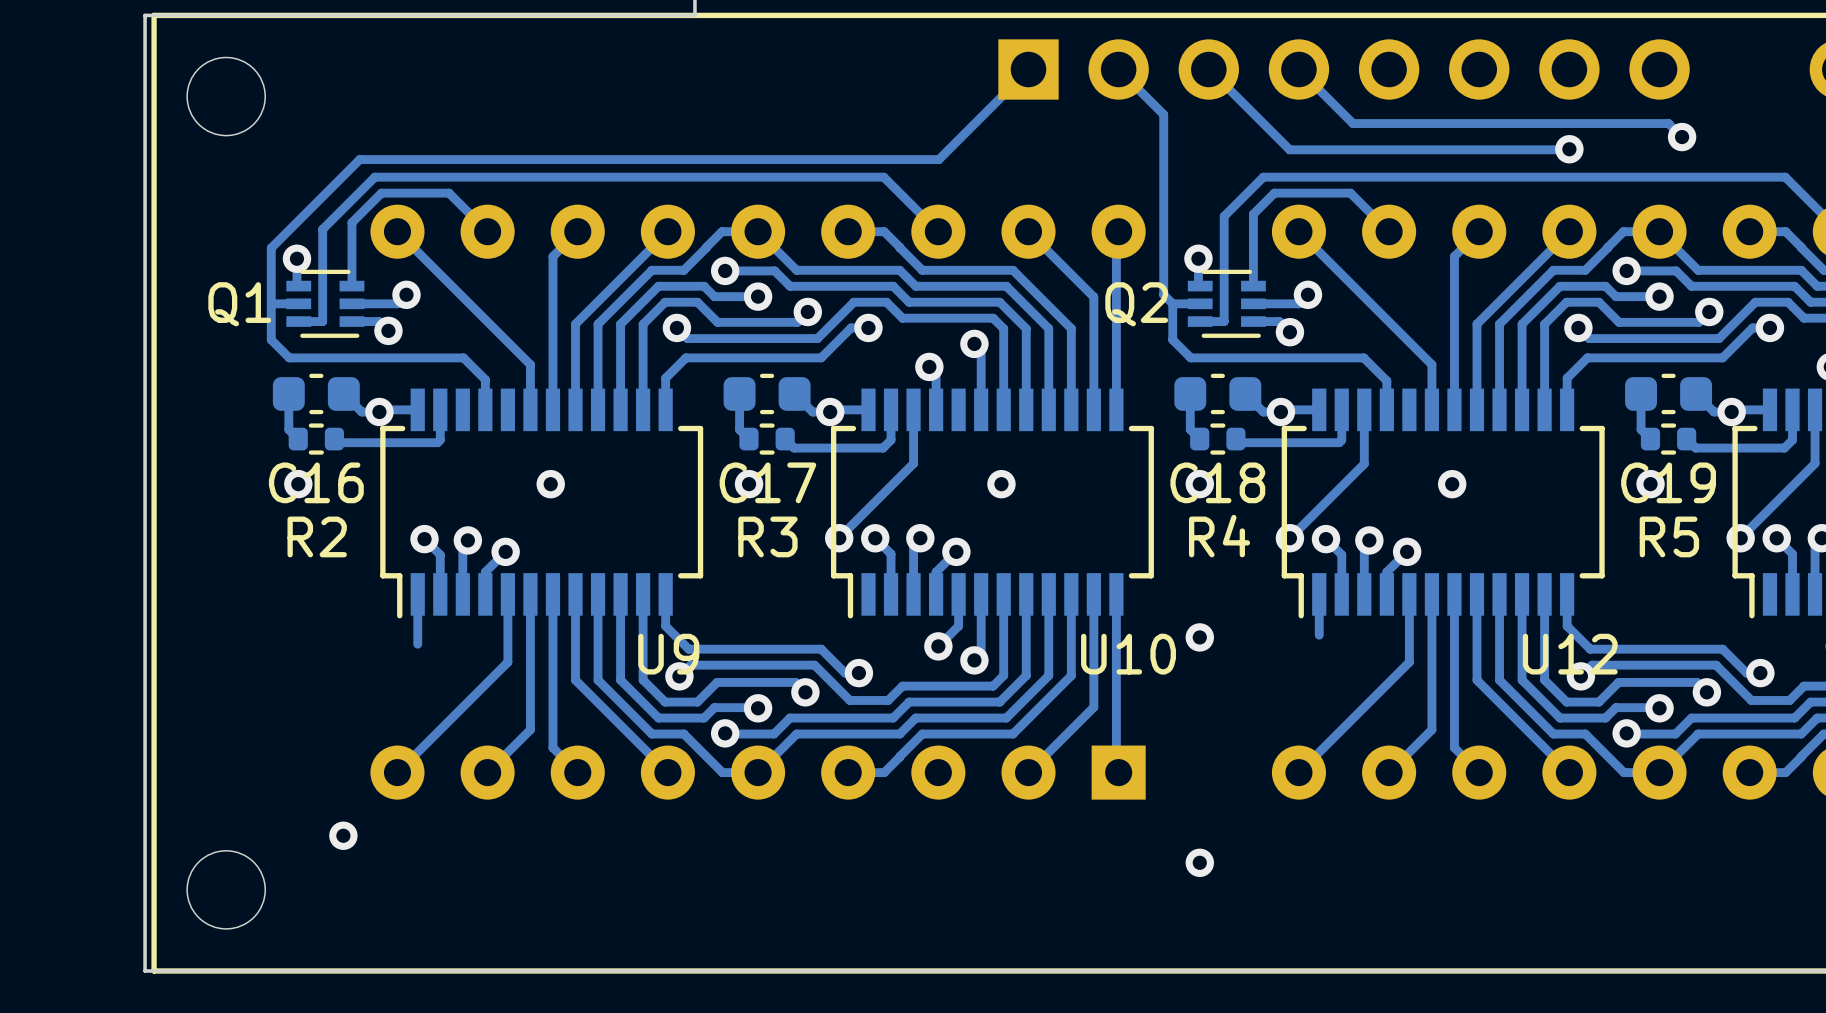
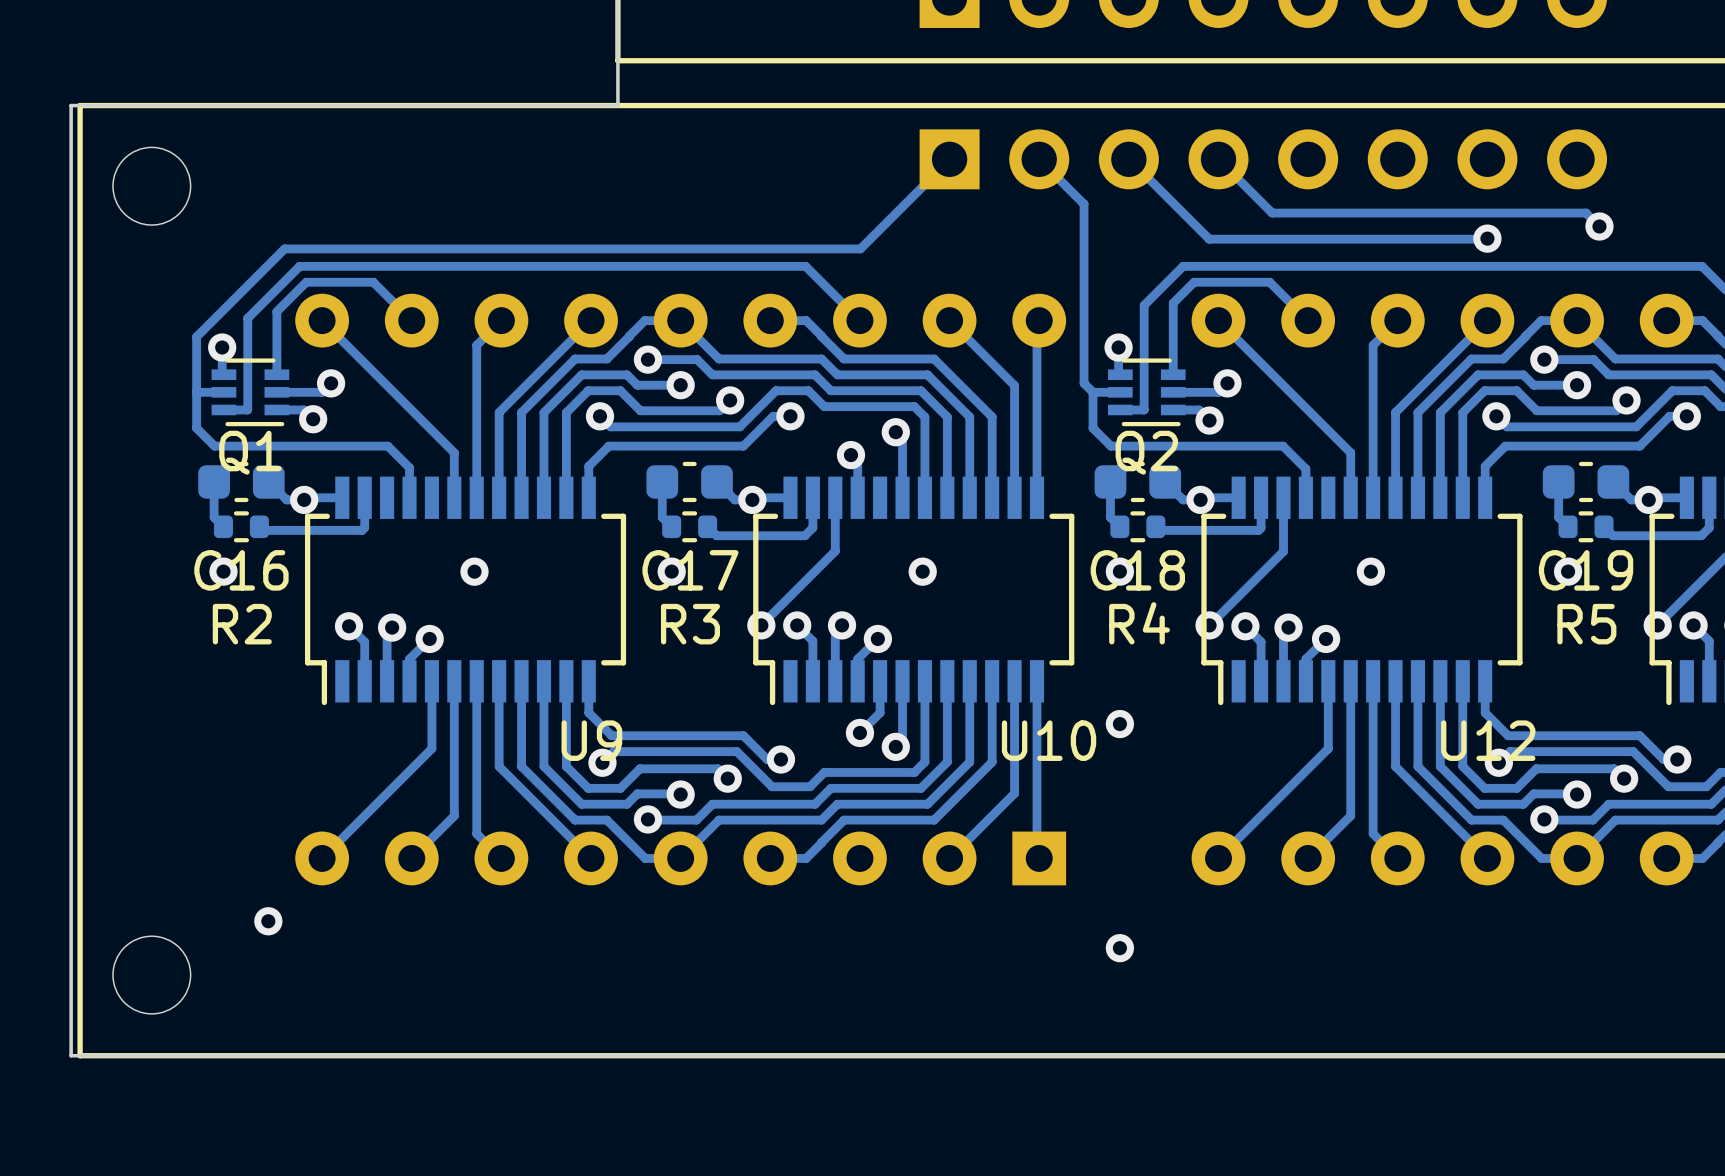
Q1 name position: Q1 (239, 304) -> Q1 (250, 452)
Q2 name position: Q2 (1136, 304) -> Q2 (1146, 452)
track: (417, 594) (417, 644) -> none
track: (1319, 594) (1319, 635) -> none

